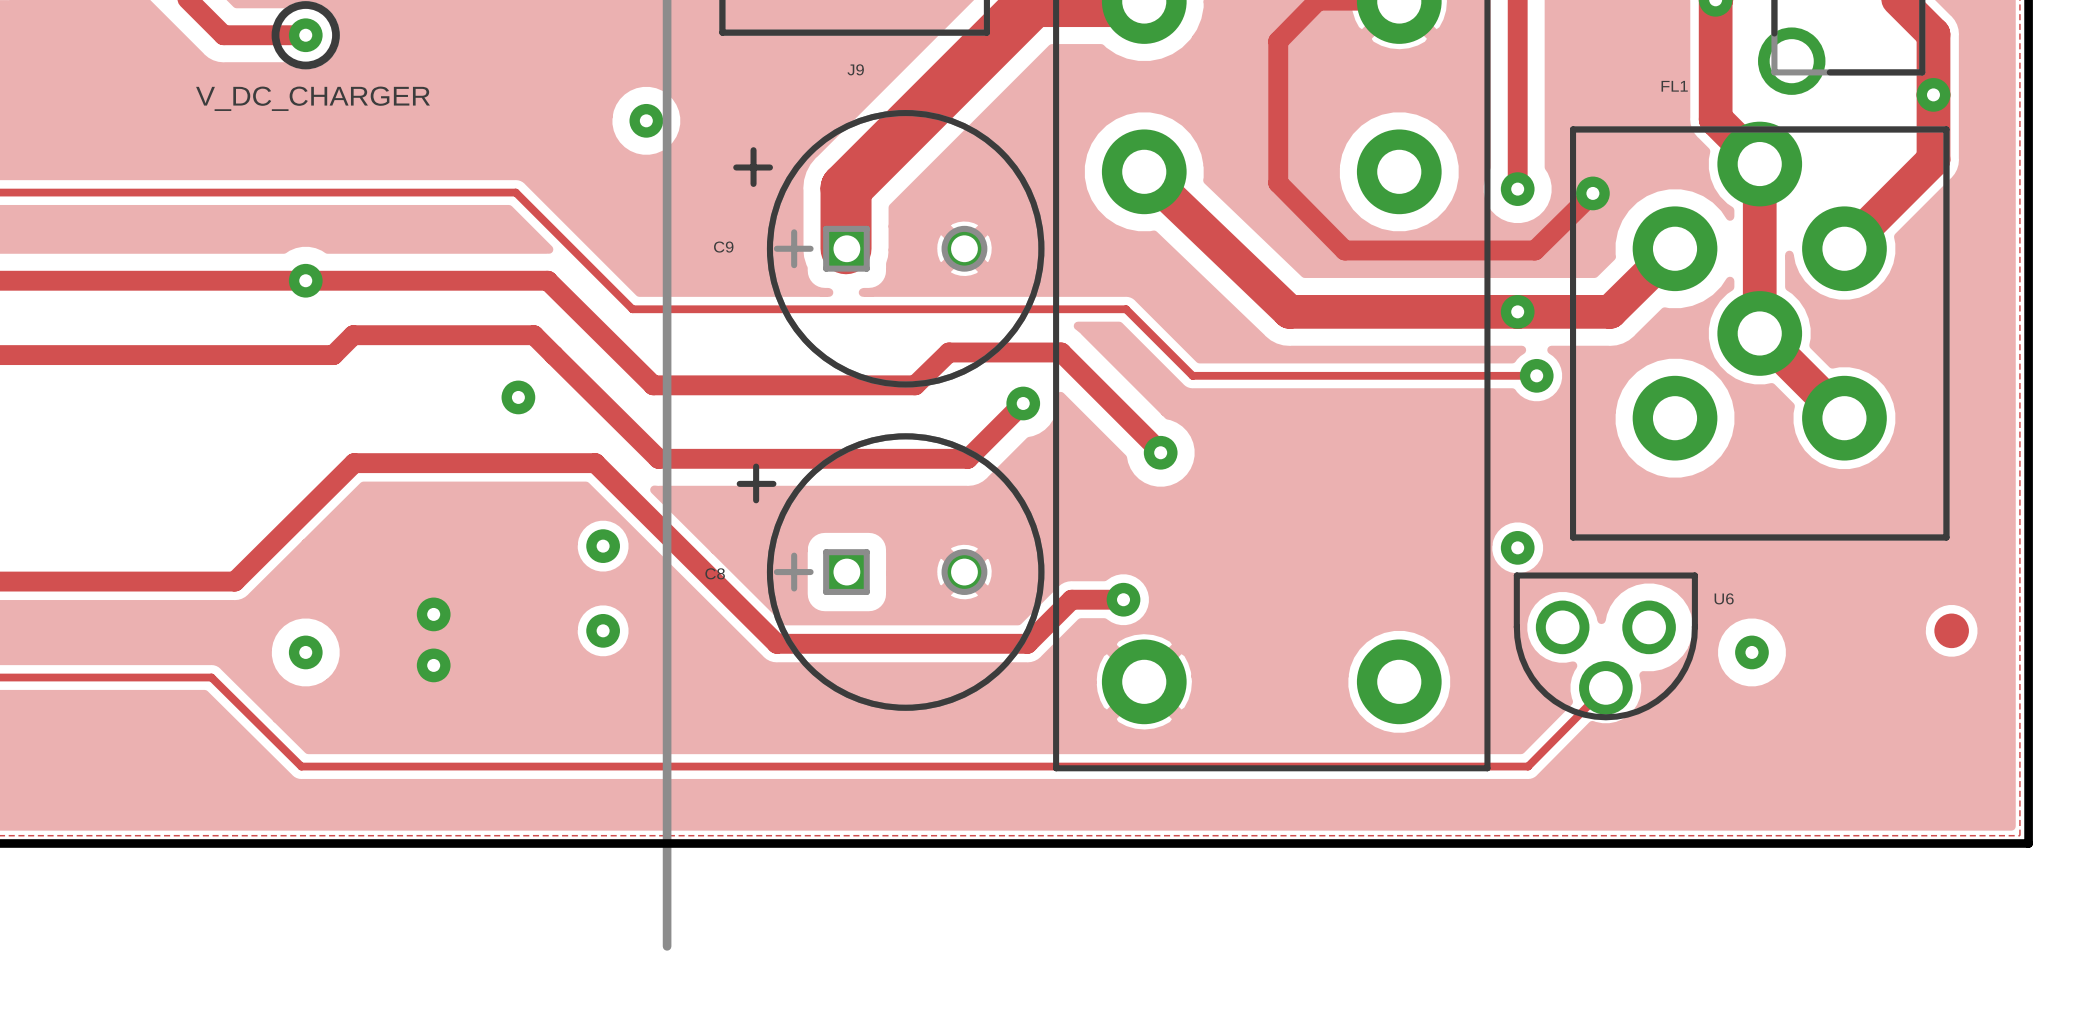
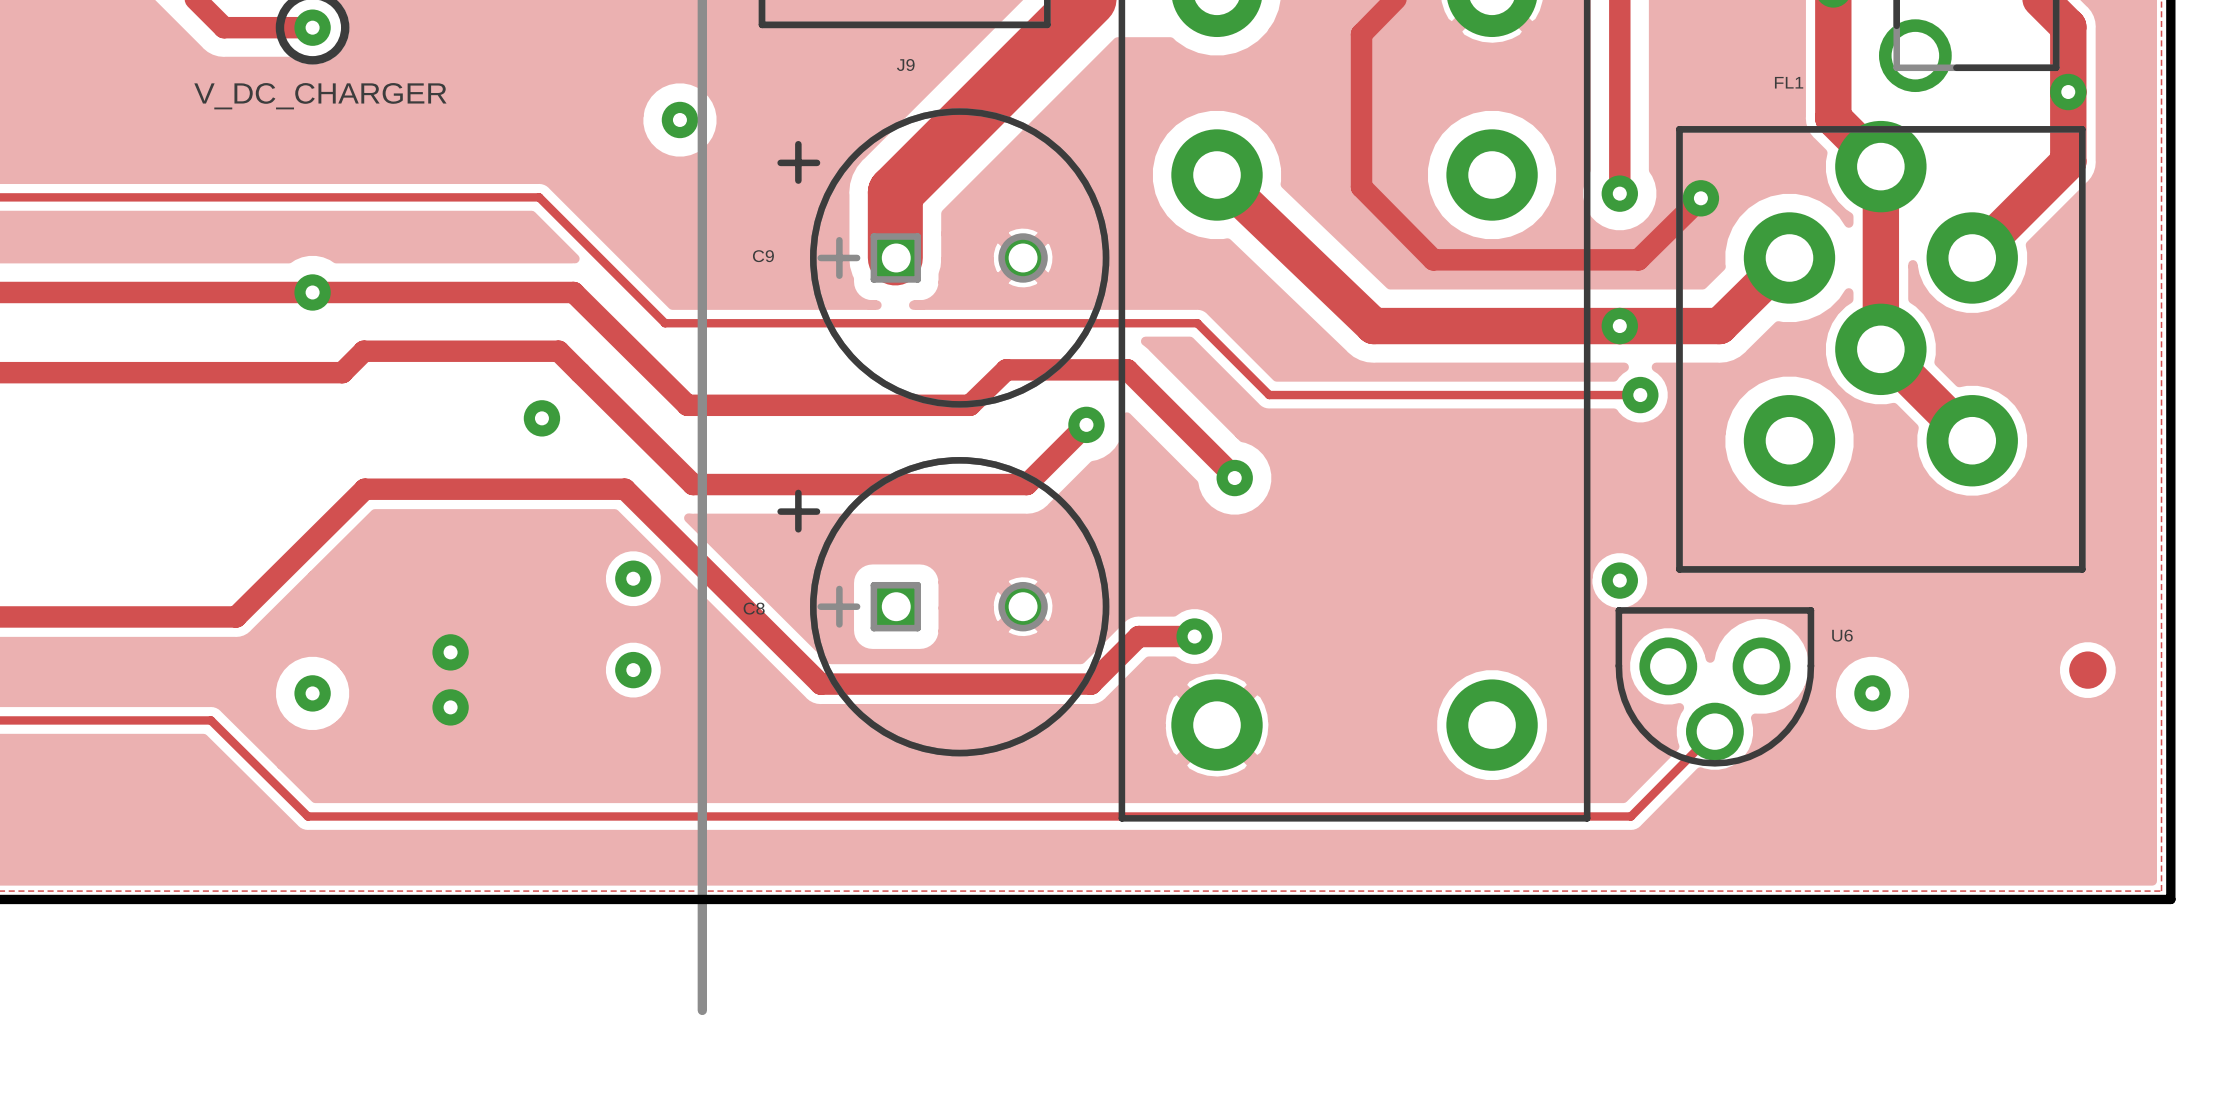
C9 footprint: [733, 110, 1045, 388] -> [777, 108, 1110, 408]

